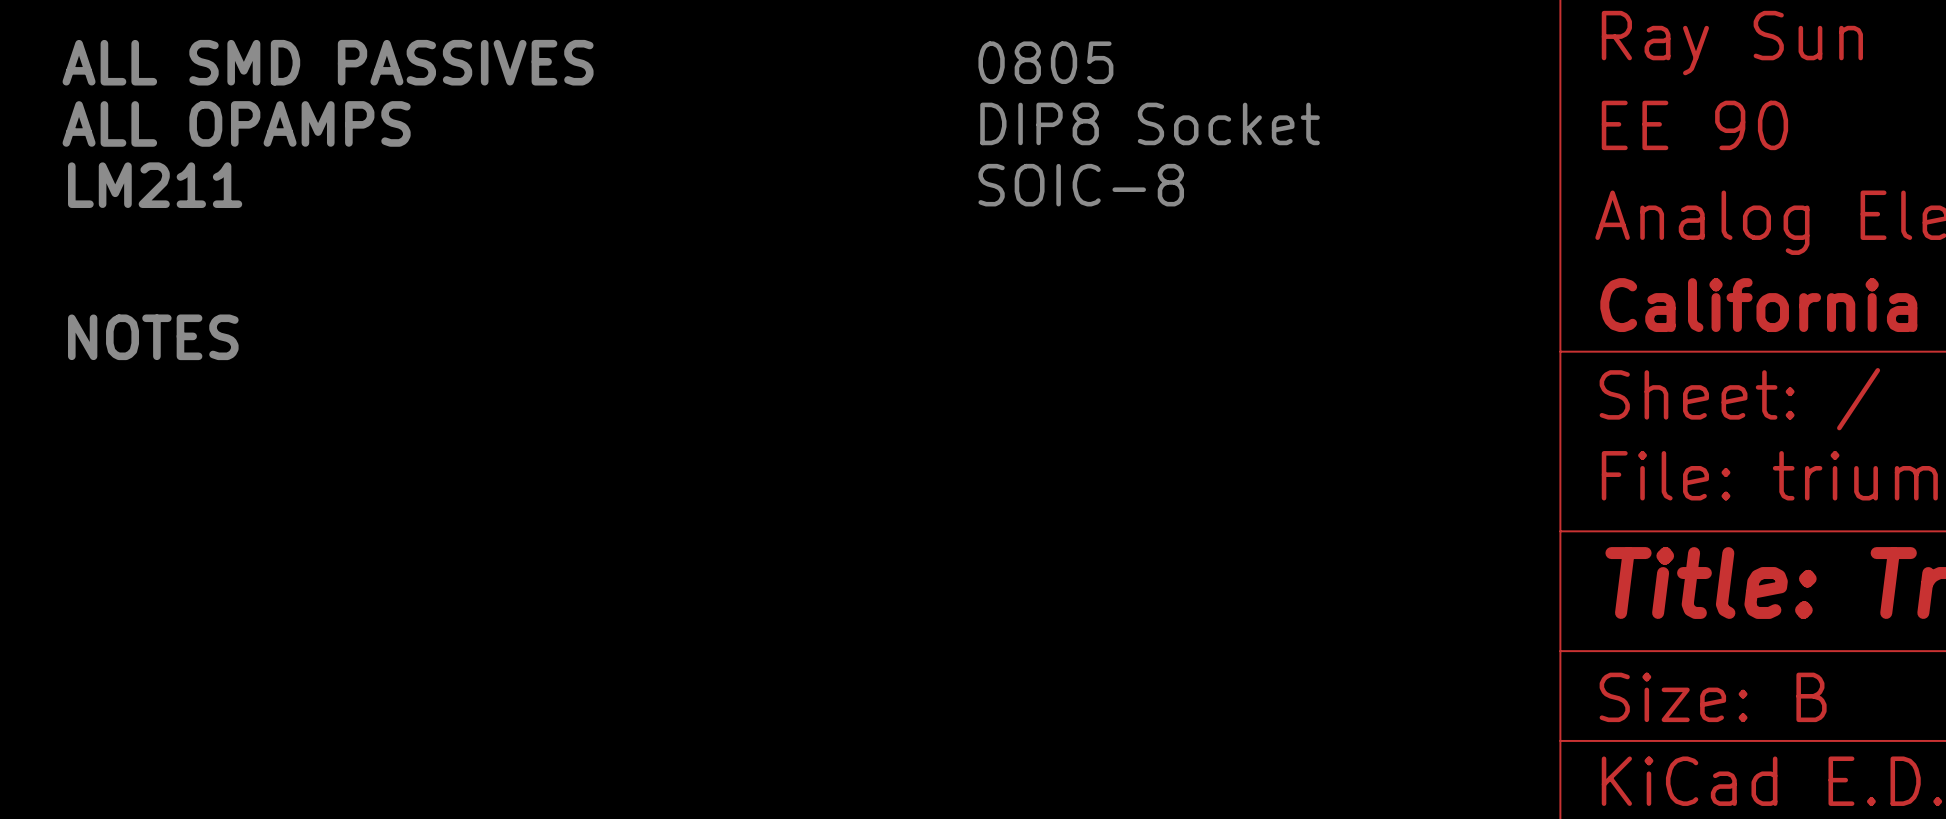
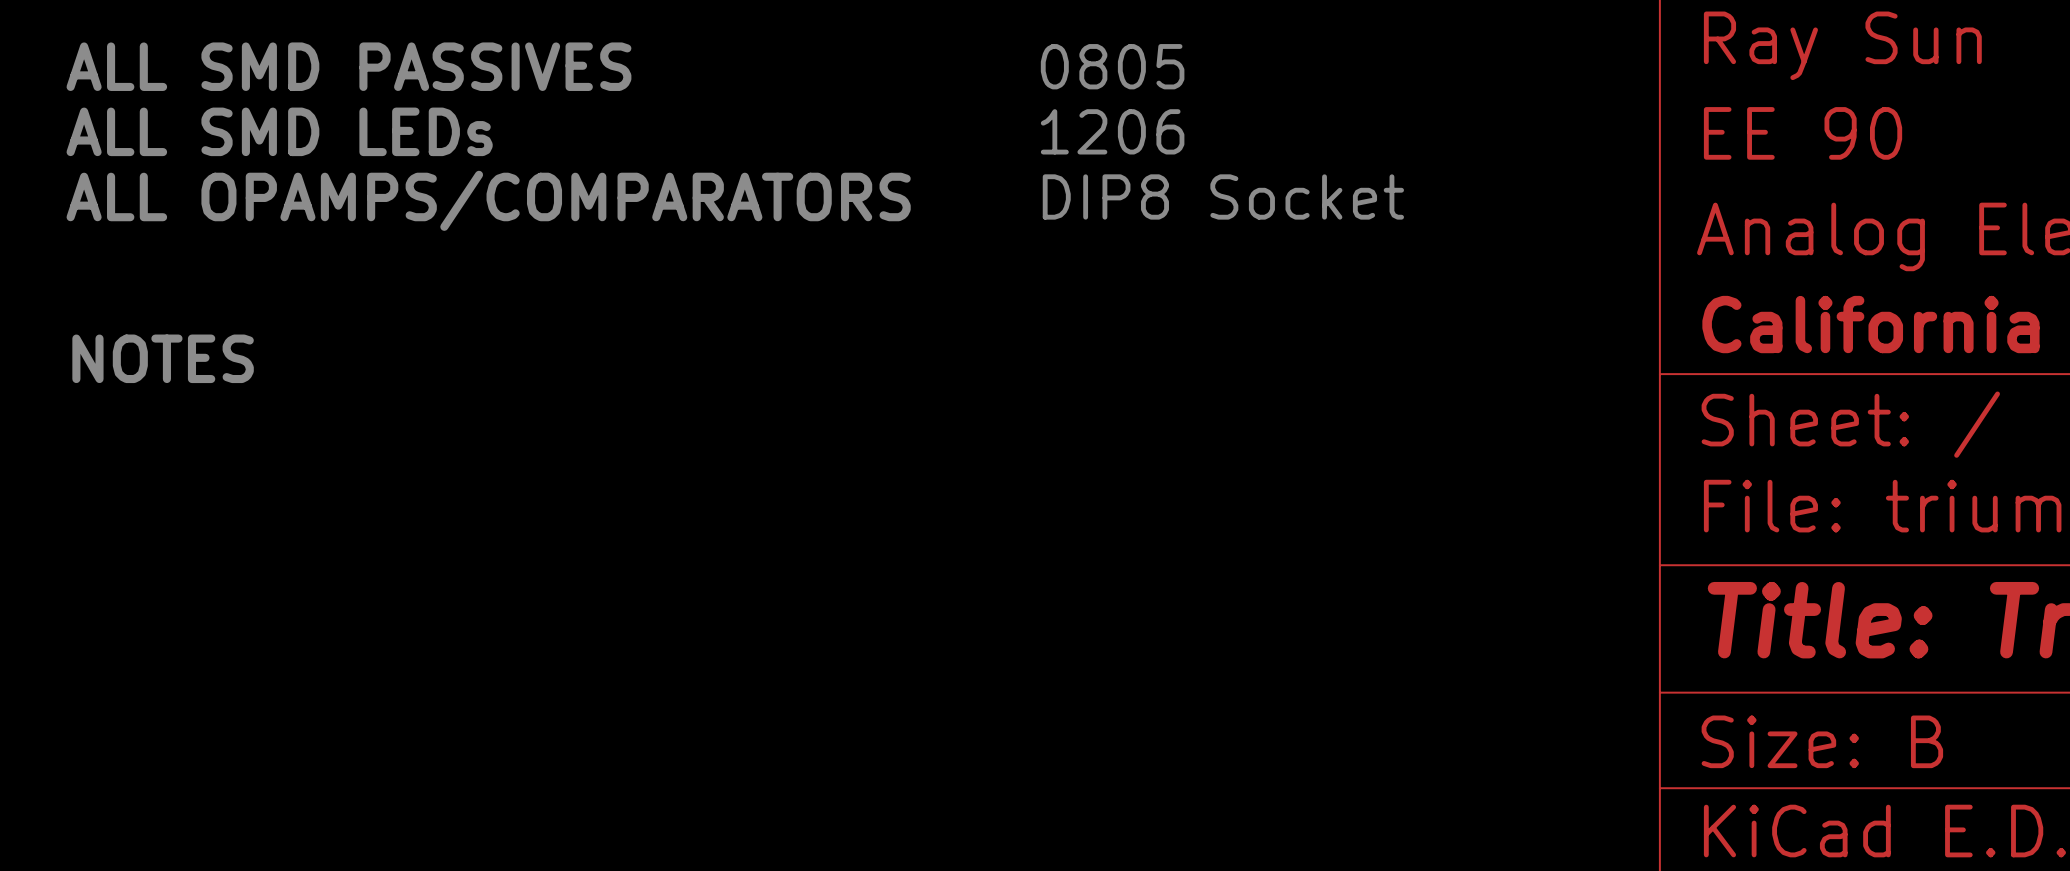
text: ALL OPAMPS (236, 123) -> ALL SMD LEDs (279, 131)
text: DIP8 Socket (1150, 123) -> 1206 (1112, 131)
text: LM211 (155, 185) -> ALL OPAMPS/COMPARATORS (488, 200)
text: SOIC-8 (1081, 185) -> DIP8 Socket (1223, 196)

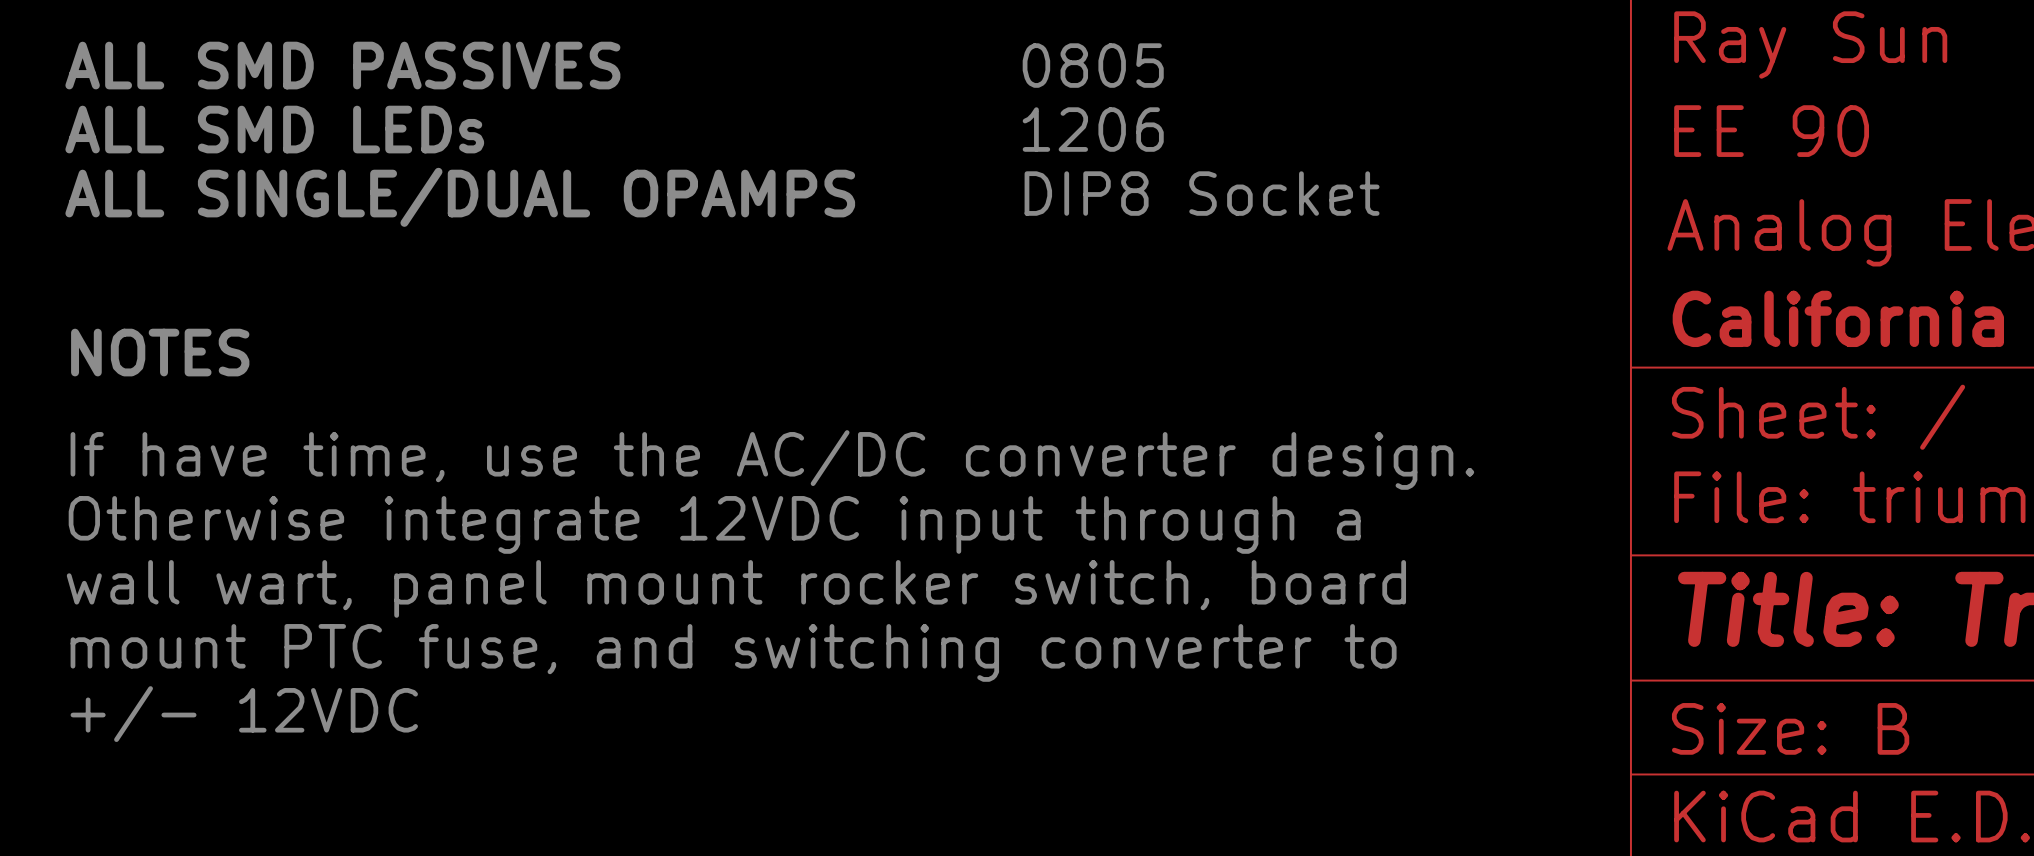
text: ALL OPAMPS/COMPARATORS (488, 200) -> ALL SINGLE/DUAL OPAMPS (460, 197)
text: none -> If have time, use the AC/DC converter design. (772, 459)
text: none -> Otherwise integrate 12VDC input through a (714, 524)
text: none -> wall wart, panel mount rocker switch, board (736, 588)
text: none -> mount PTC fuse, and switching converter to (733, 652)
text: none -> +/- 12VDC (244, 714)

